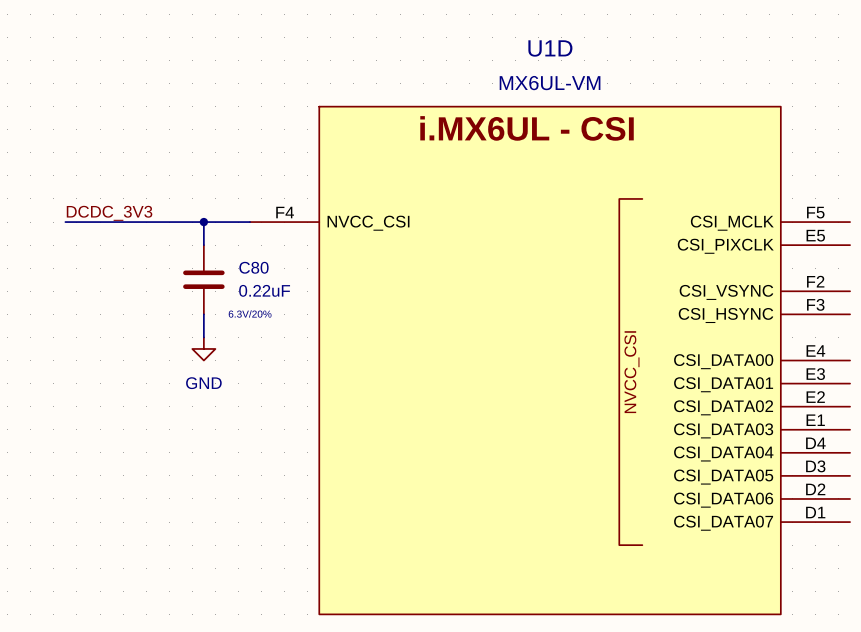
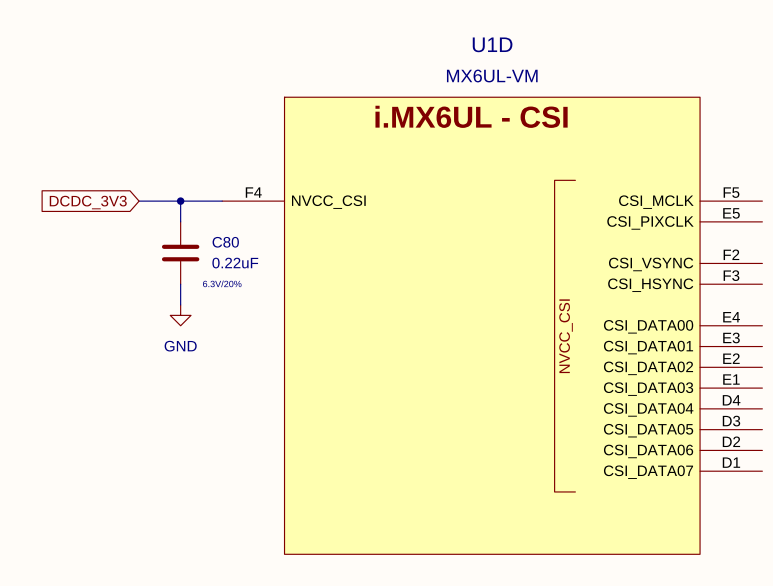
label: DCDC_3V3 (109, 213) -> none
wire: (65, 222) (157, 222) -> none
global label: none -> DCDC_3V3 (88, 202)

